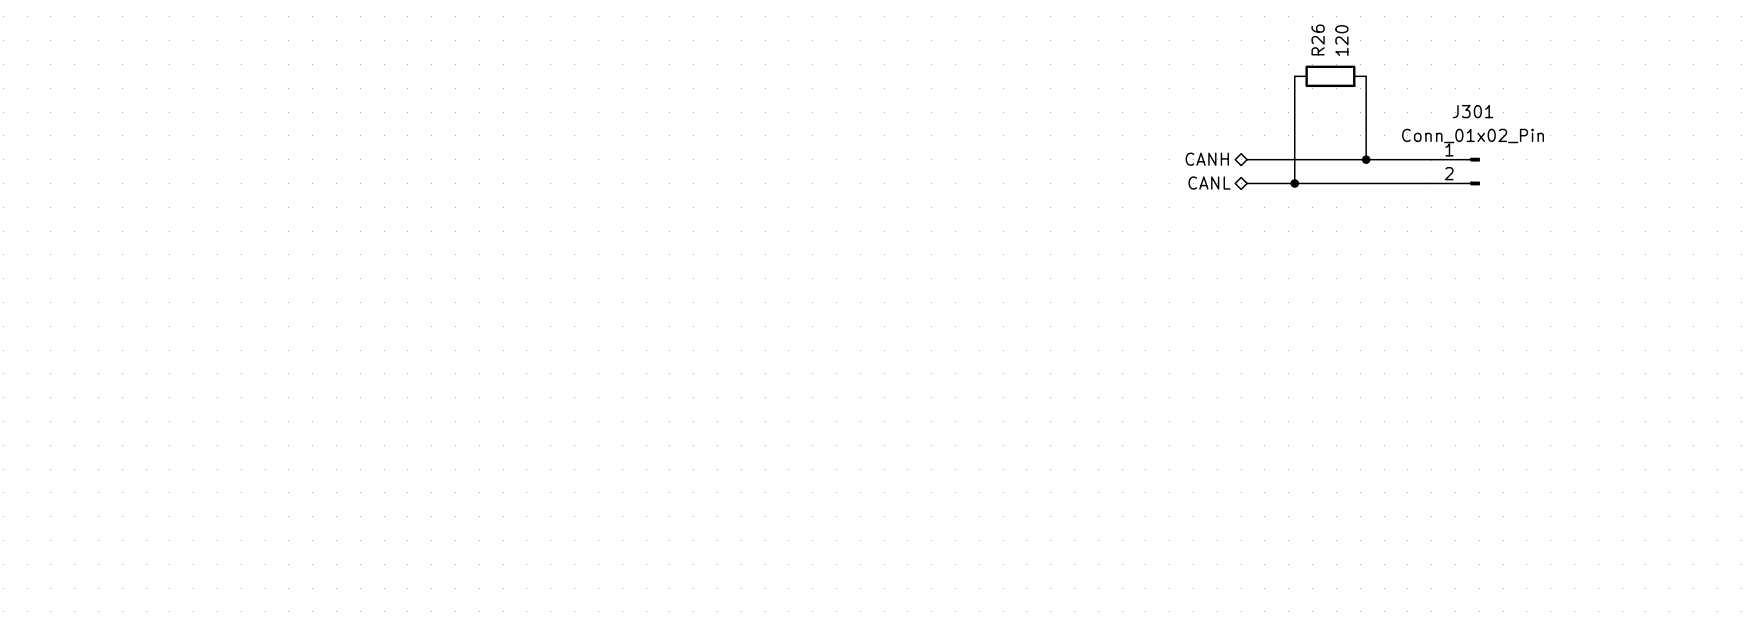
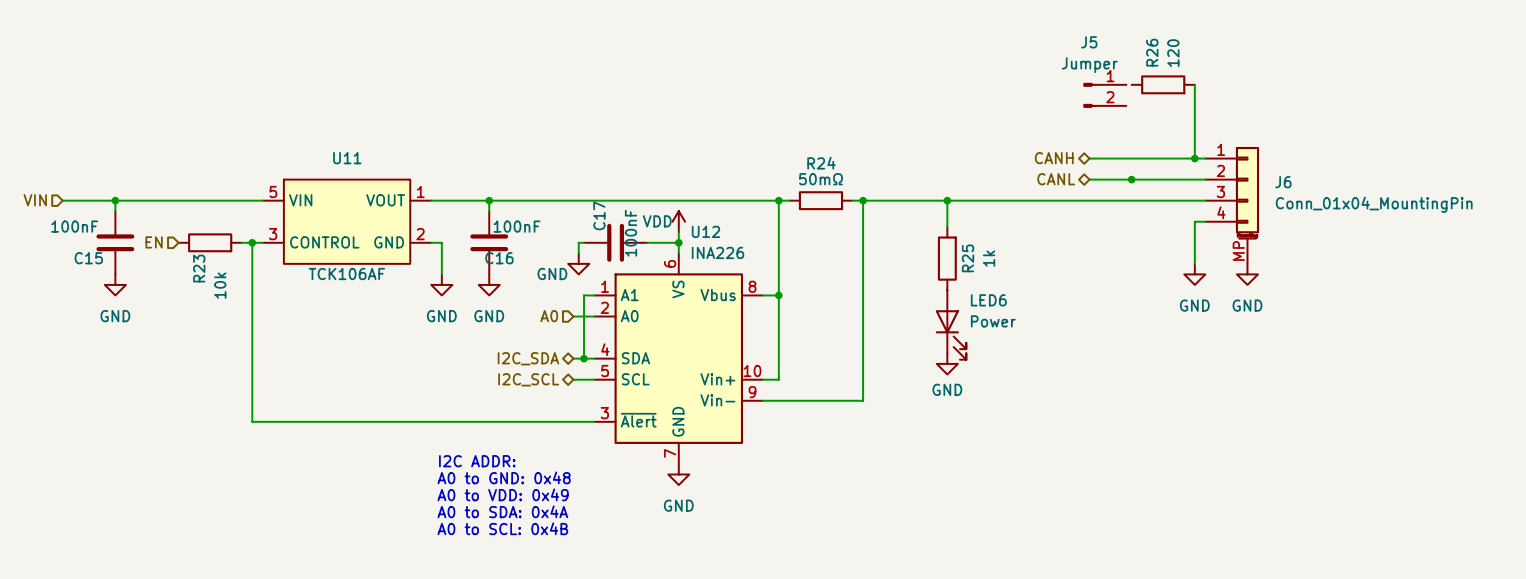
wire: (1294, 76) (1294, 183) -> none
J5: none -> Jumper (1104, 95)
J301: Conn_01x02_Pin (1455, 171) -> none
hierarchical label: none -> VIN (35, 200)
wire: none -> (62, 200) (262, 200)
wire: none -> (115, 200) (115, 211)
junction: none -> (115, 200)
wire: none -> (431, 200) (789, 200)
wire: none -> (489, 200) (489, 211)
junction: none -> (489, 200)
wire: none -> (778, 200) (778, 379) (763, 379)
junction: none -> (778, 200)
R24: none -> 50mΩ (820, 200)
wire: none -> (852, 200) (1205, 200)
wire: none -> (863, 200) (863, 400) (763, 400)
junction: none -> (863, 200)
wire: none -> (947, 200) (947, 227)
junction: none -> (947, 200)
J6: none -> Conn_01x04_MountingPin (1232, 205)
U11: none -> TCK106AF (347, 221)
power symbol: none -> VDD (678, 221)
wire: none -> (1205, 221) (1194, 221) (1194, 263)
wire: none -> (678, 232) (678, 253)
C15: none -> 100nF (115, 242)
hierarchical label: none -> EN (154, 242)
R23: none -> 10k (210, 242)
wire: none -> (241, 242) (262, 242)
wire: none -> (252, 242) (252, 421) (594, 421)
junction: none -> (252, 242)
wire: none -> (431, 242) (441, 242) (441, 274)
C16: none -> 100nF (489, 242)
wire: none -> (584, 242) (578, 242) (578, 253)
C17: none -> 100nF (615, 242)
wire: none -> (647, 242) (678, 242)
junction: none -> (678, 242)
R25: none -> 1k (947, 258)
power symbol: none -> GND (578, 263)
power symbol: none -> GND (1194, 274)
power symbol: none -> GND (1247, 274)
power symbol: none -> GND (115, 284)
power symbol: none -> GND (441, 284)
power symbol: none -> GND (489, 284)
wire: none -> (594, 295) (584, 295) (584, 358)
wire: none -> (763, 295) (778, 295)
junction: none -> (778, 295)
hierarchical label: none -> A0 (549, 316)
wire: none -> (573, 316) (594, 316)
LED6: none -> Power (951, 324)
hierarchical label: none -> I2C_SDA (528, 358)
wire: none -> (573, 358) (594, 358)
junction: none -> (584, 358)
U12: none -> INA226 (678, 358)
power symbol: none -> GND (947, 363)
hierarchical label: none -> I2C_SCL (528, 379)
wire: none -> (573, 379) (594, 379)
text: none -> I2C ADDR: (477, 461)
power symbol: none -> GND (678, 474)
text: none -> A0 to GND: 0x48 (504, 477)
text: none -> A0 to VDD: 0x49 (503, 494)
text: none -> A0 to SDA: 0x4A (502, 511)
text: none -> A0 to SCL: 0x4B (502, 528)

